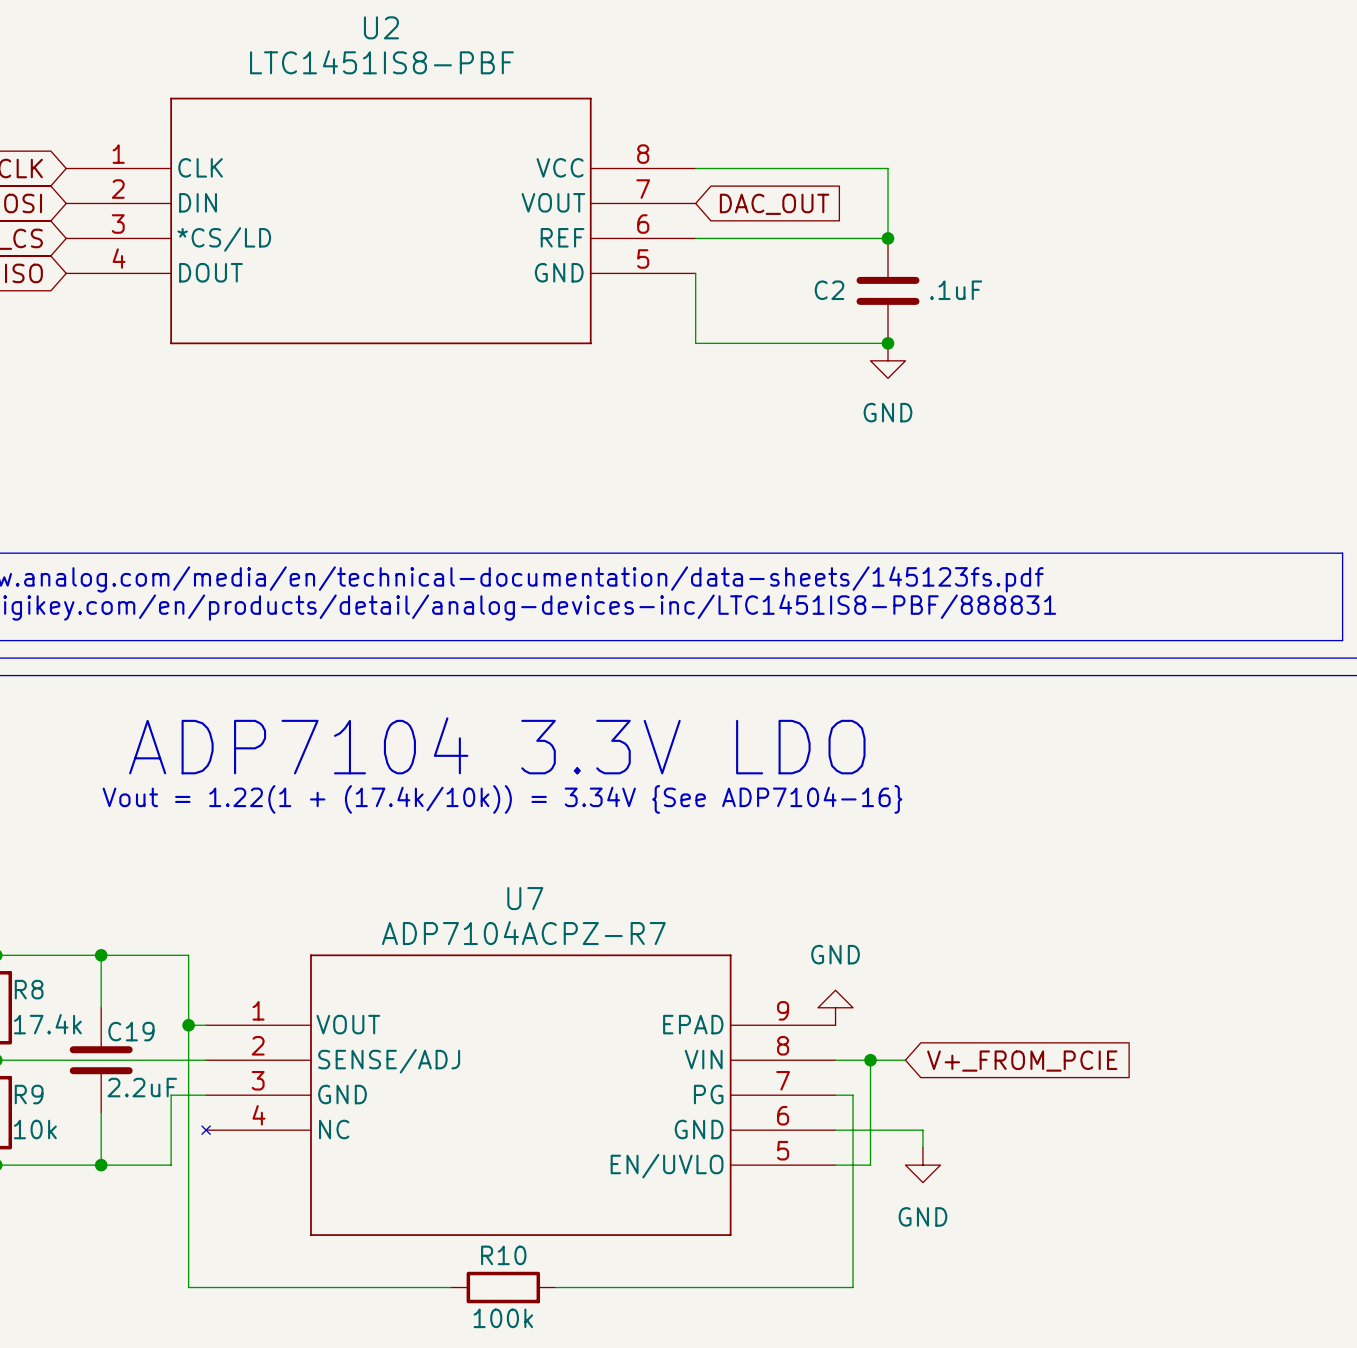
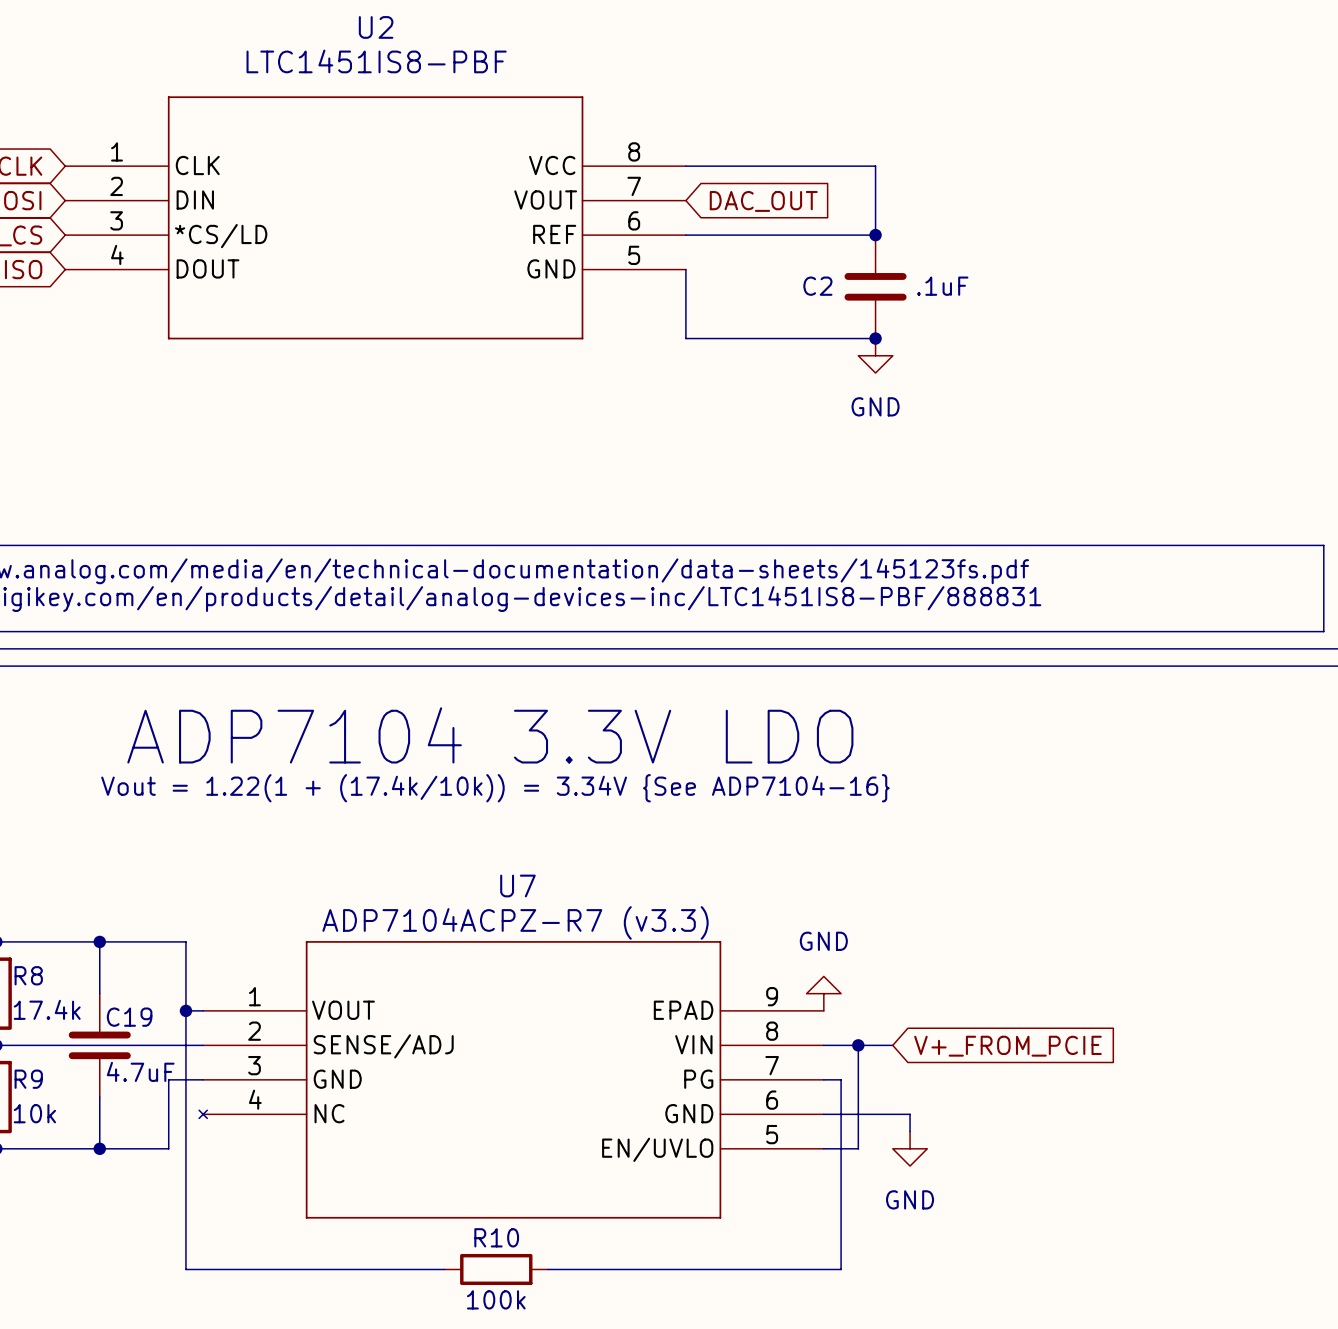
U7 value: ADP7104ACPZ-R7 (523, 933) -> ADP7104ACPZ-R7 (v3.3) (515, 922)
C19 value: 2.2uF (142, 1087) -> 4.7uF (140, 1071)

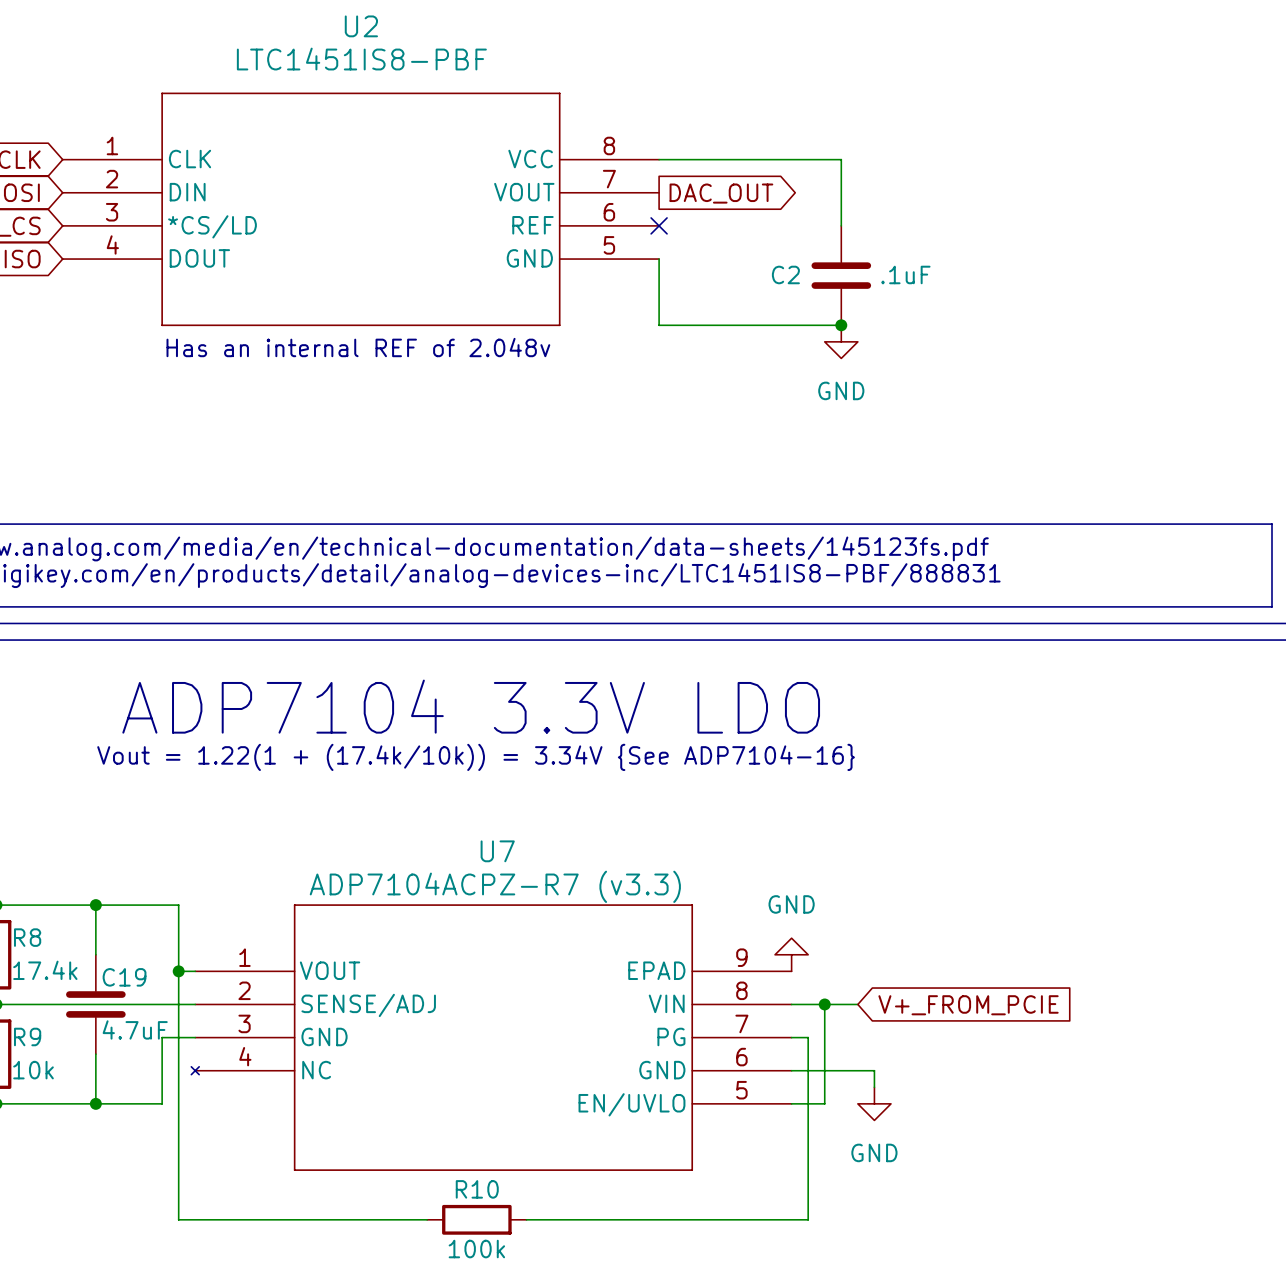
global label shape: input (763, 201) -> output (721, 193)
wire: (685, 235) (875, 235) -> none
no-connect mark: none -> (659, 225)
junction: (875, 235) -> none
text: none -> Has an internal REF of 2.048v (358, 347)

